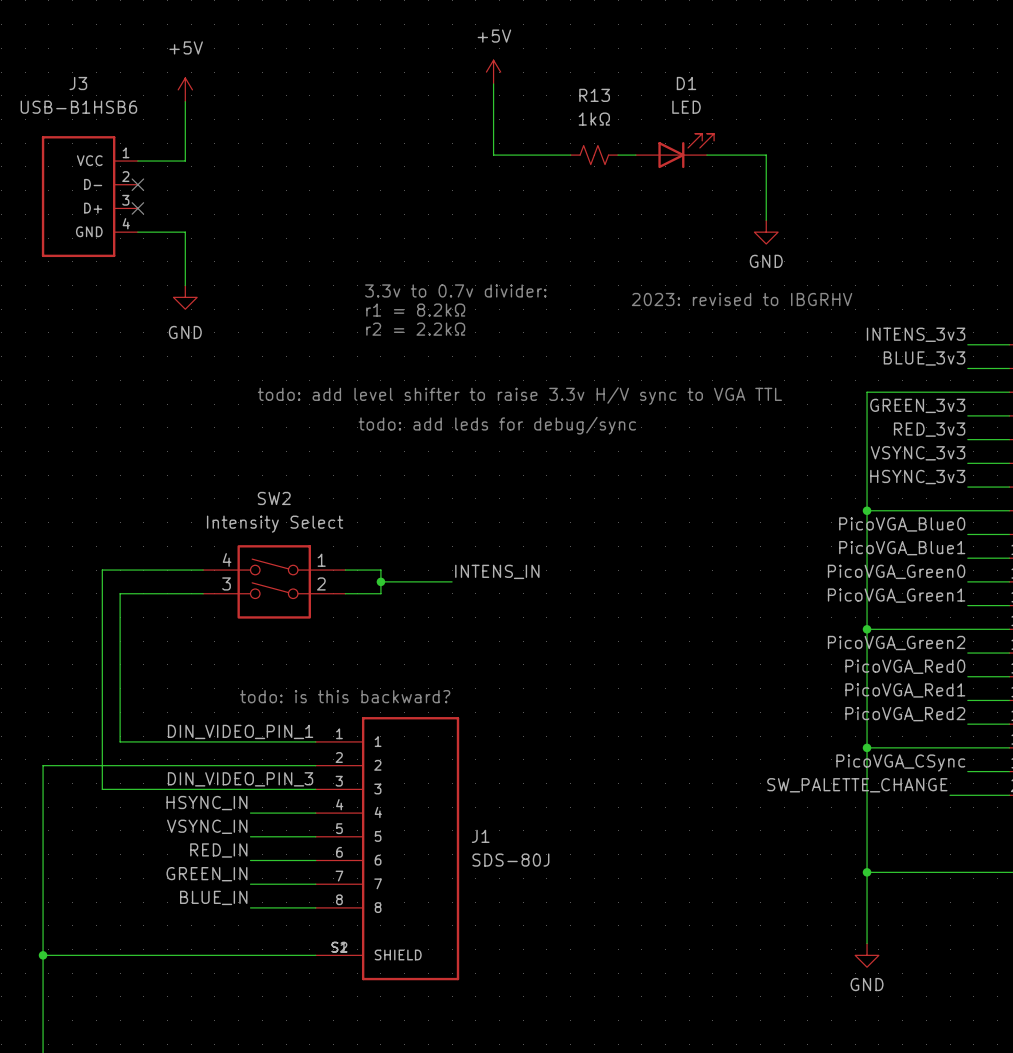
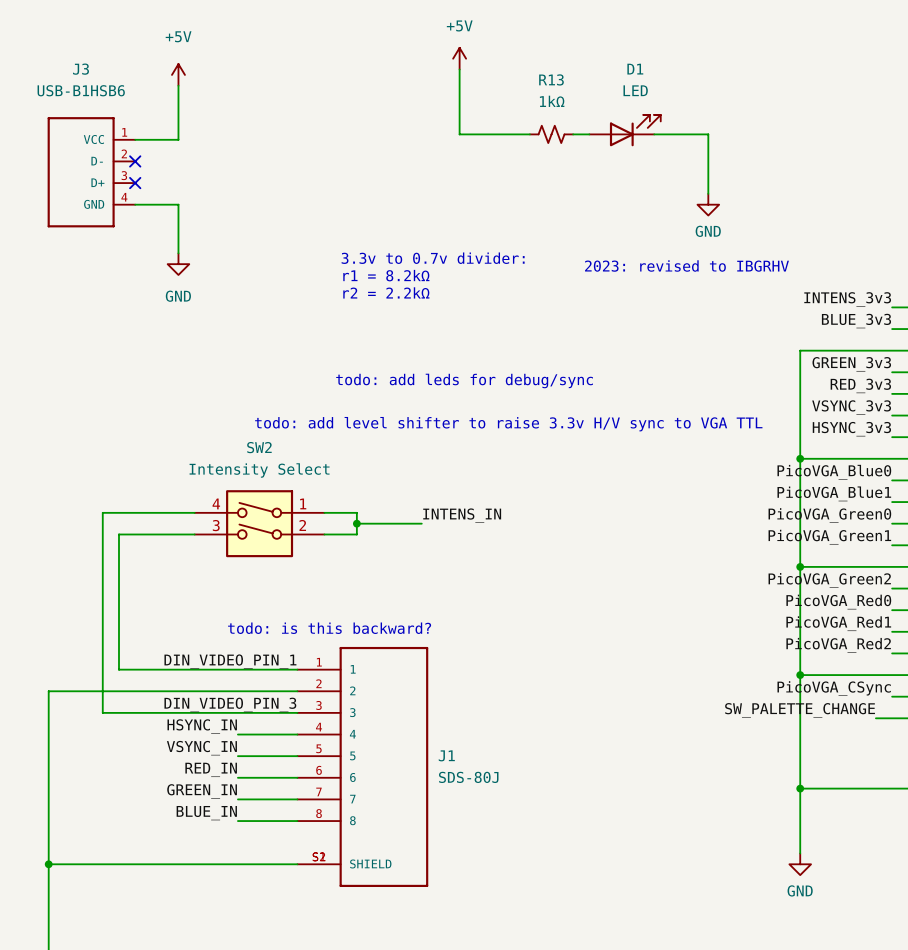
text position: todo: add level shifter to raise 3.3v H/V sync to VGA TTL (519, 396) -> todo: add level shifter to raise 3.3v H/V sync to VGA TTL (508, 424)

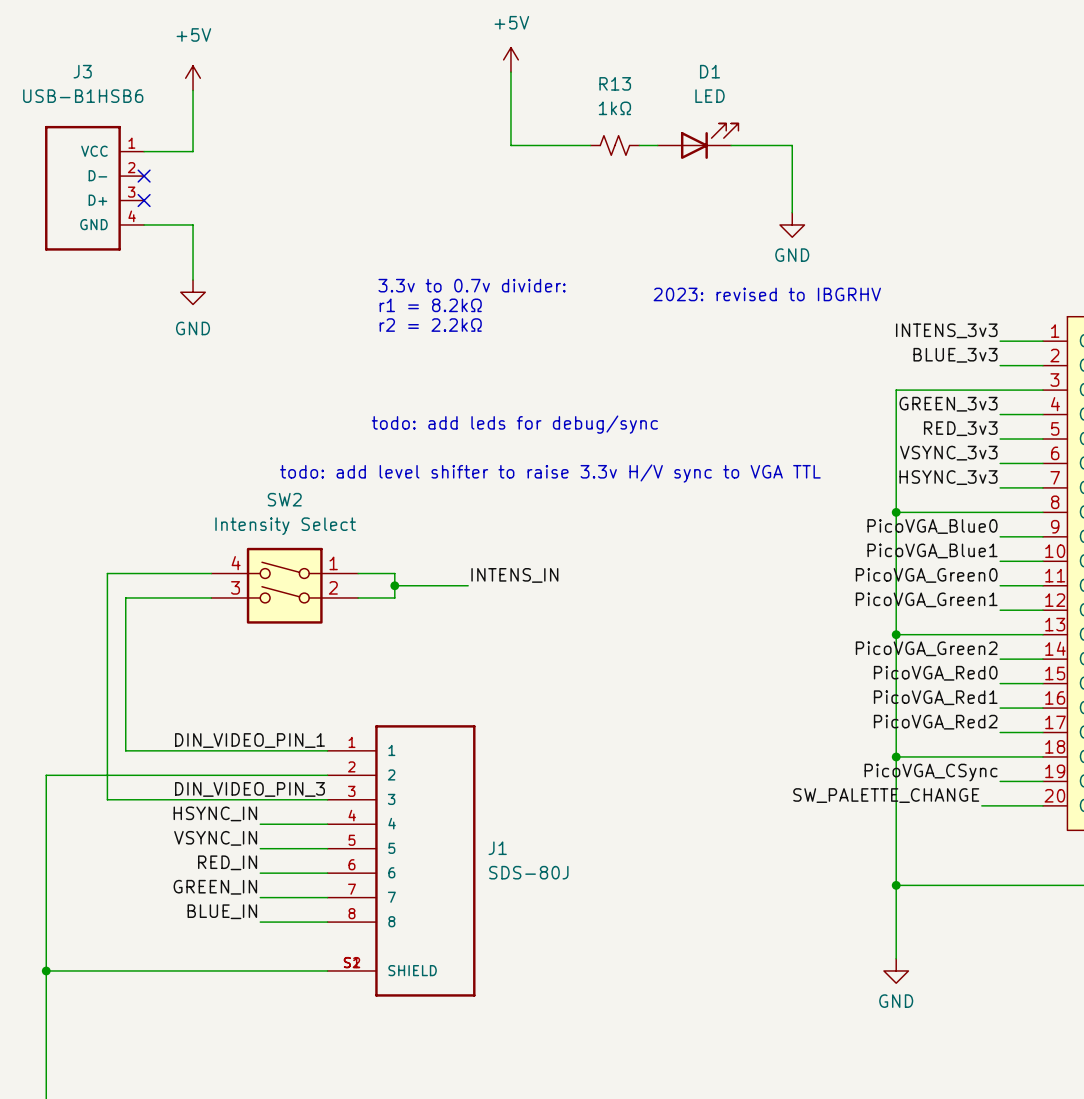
text: todo: is this backward? (329, 628) -> none

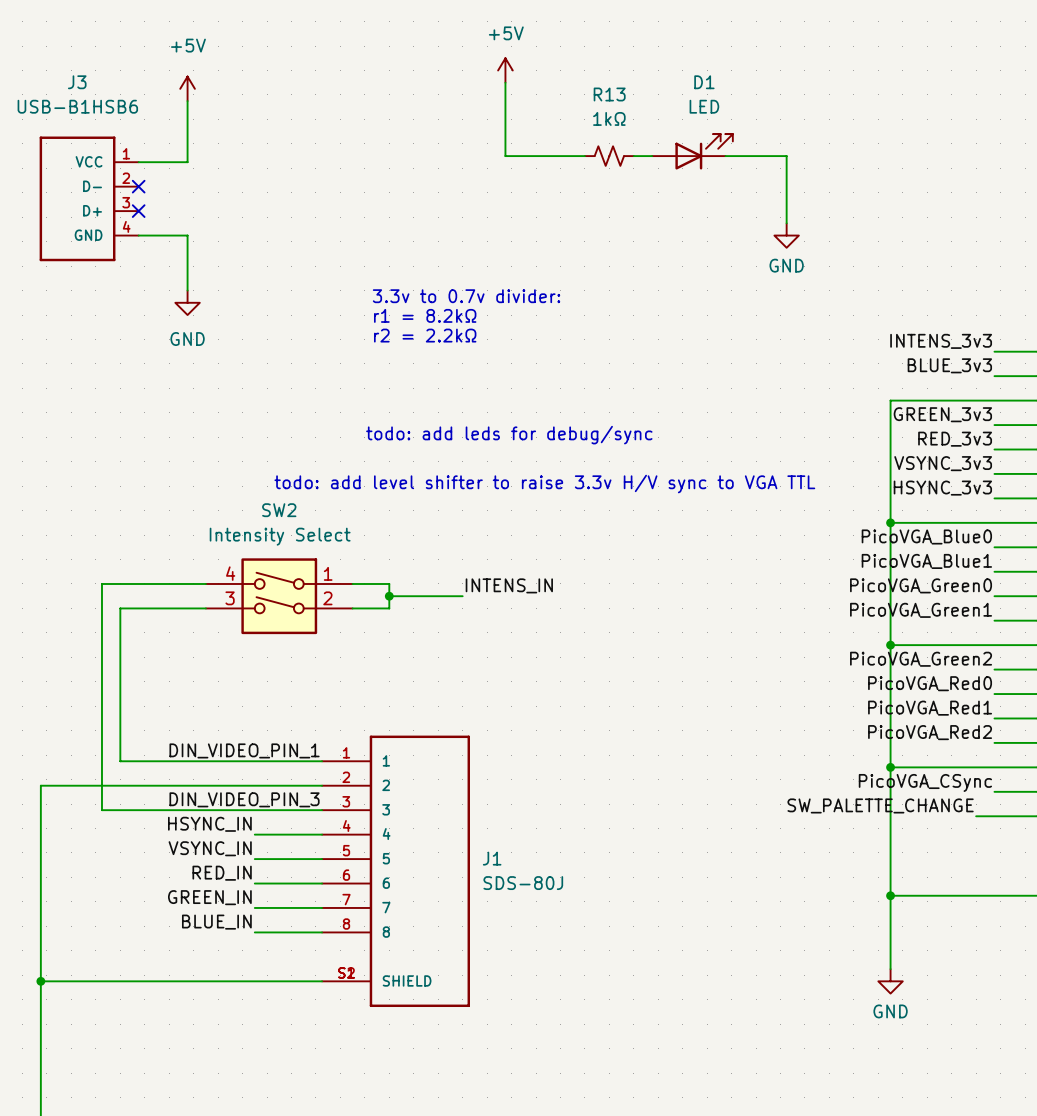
text: 2023: revised to IBGRHV (767, 294) -> none

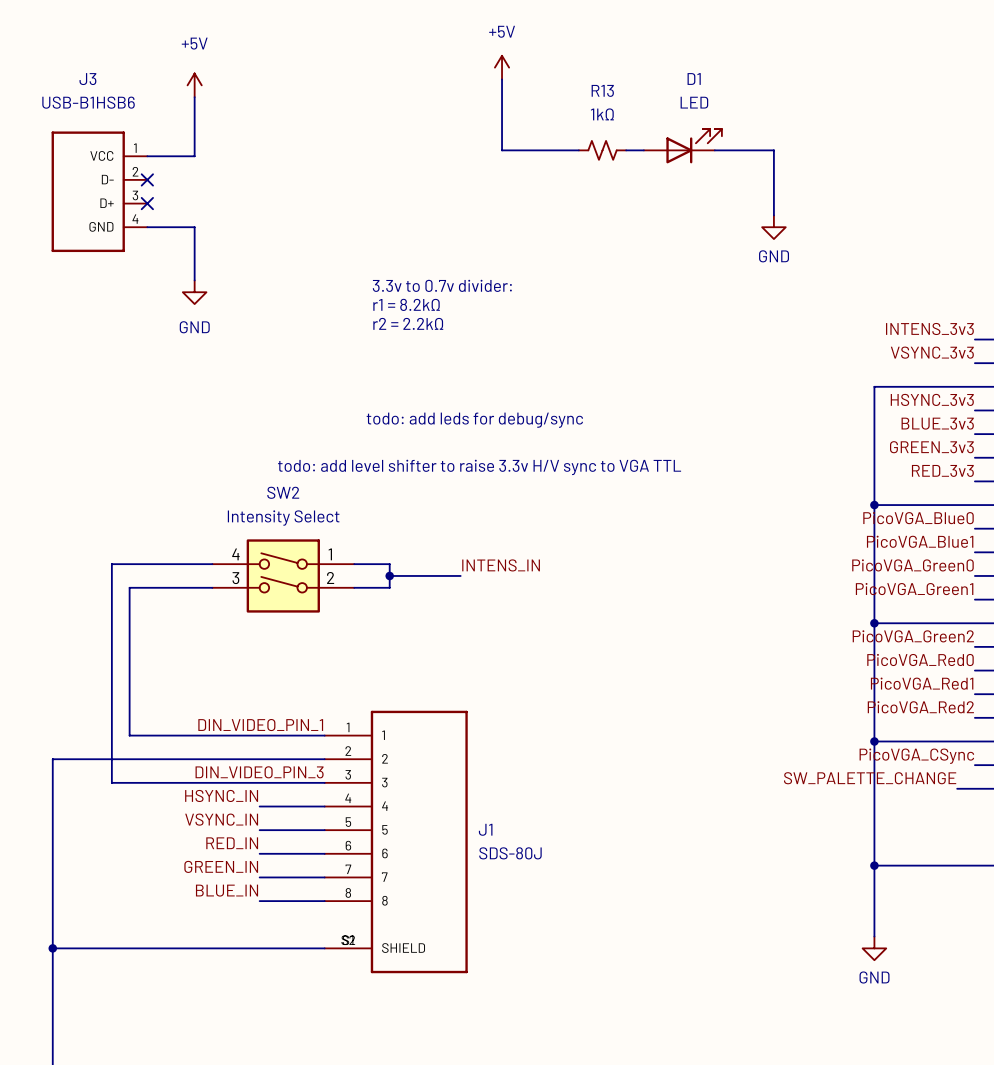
label: BLUE_3v3 (949, 365) -> VSYNC_3v3 (932, 352)
label: GREEN_3v3 (942, 414) -> HSYNC_3v3 (932, 399)
label: RED_3v3 (955, 439) -> BLUE_3v3 (937, 423)
label: VSYNC_3v3 (943, 463) -> GREEN_3v3 (931, 447)
label: HSYNC_3v3 (942, 488) -> RED_3v3 (942, 470)

